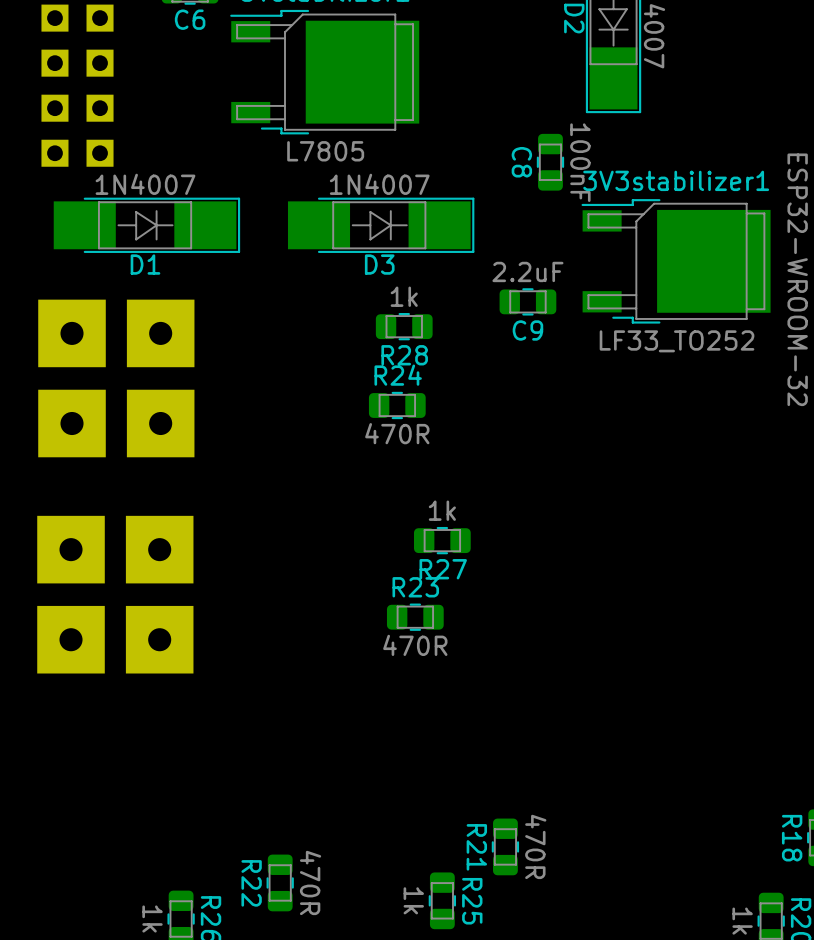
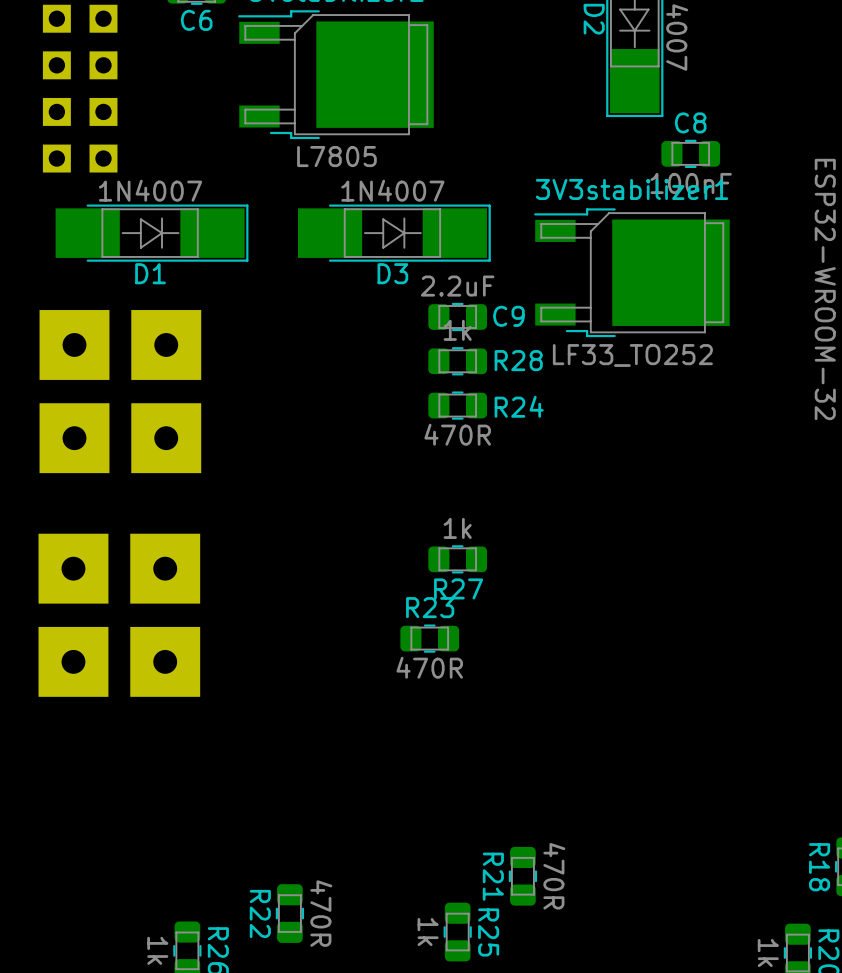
C8 rotation: 0° (550, 162) -> 90° clockwise (690, 153)
C8 position: (550, 162) -> (690, 153)
3V3stabilizer1 position: (676, 261) -> (631, 272)
C9 position: (527, 301) -> (457, 317)
R28 position: (404, 326) -> (457, 361)
C9 name position: C9 (527, 330) -> C9 (508, 316)
R28 name position: R28 (404, 355) -> R28 (518, 360)
R24 name position: R24 (398, 375) -> R24 (519, 406)
R24 position: (397, 405) -> (457, 405)

